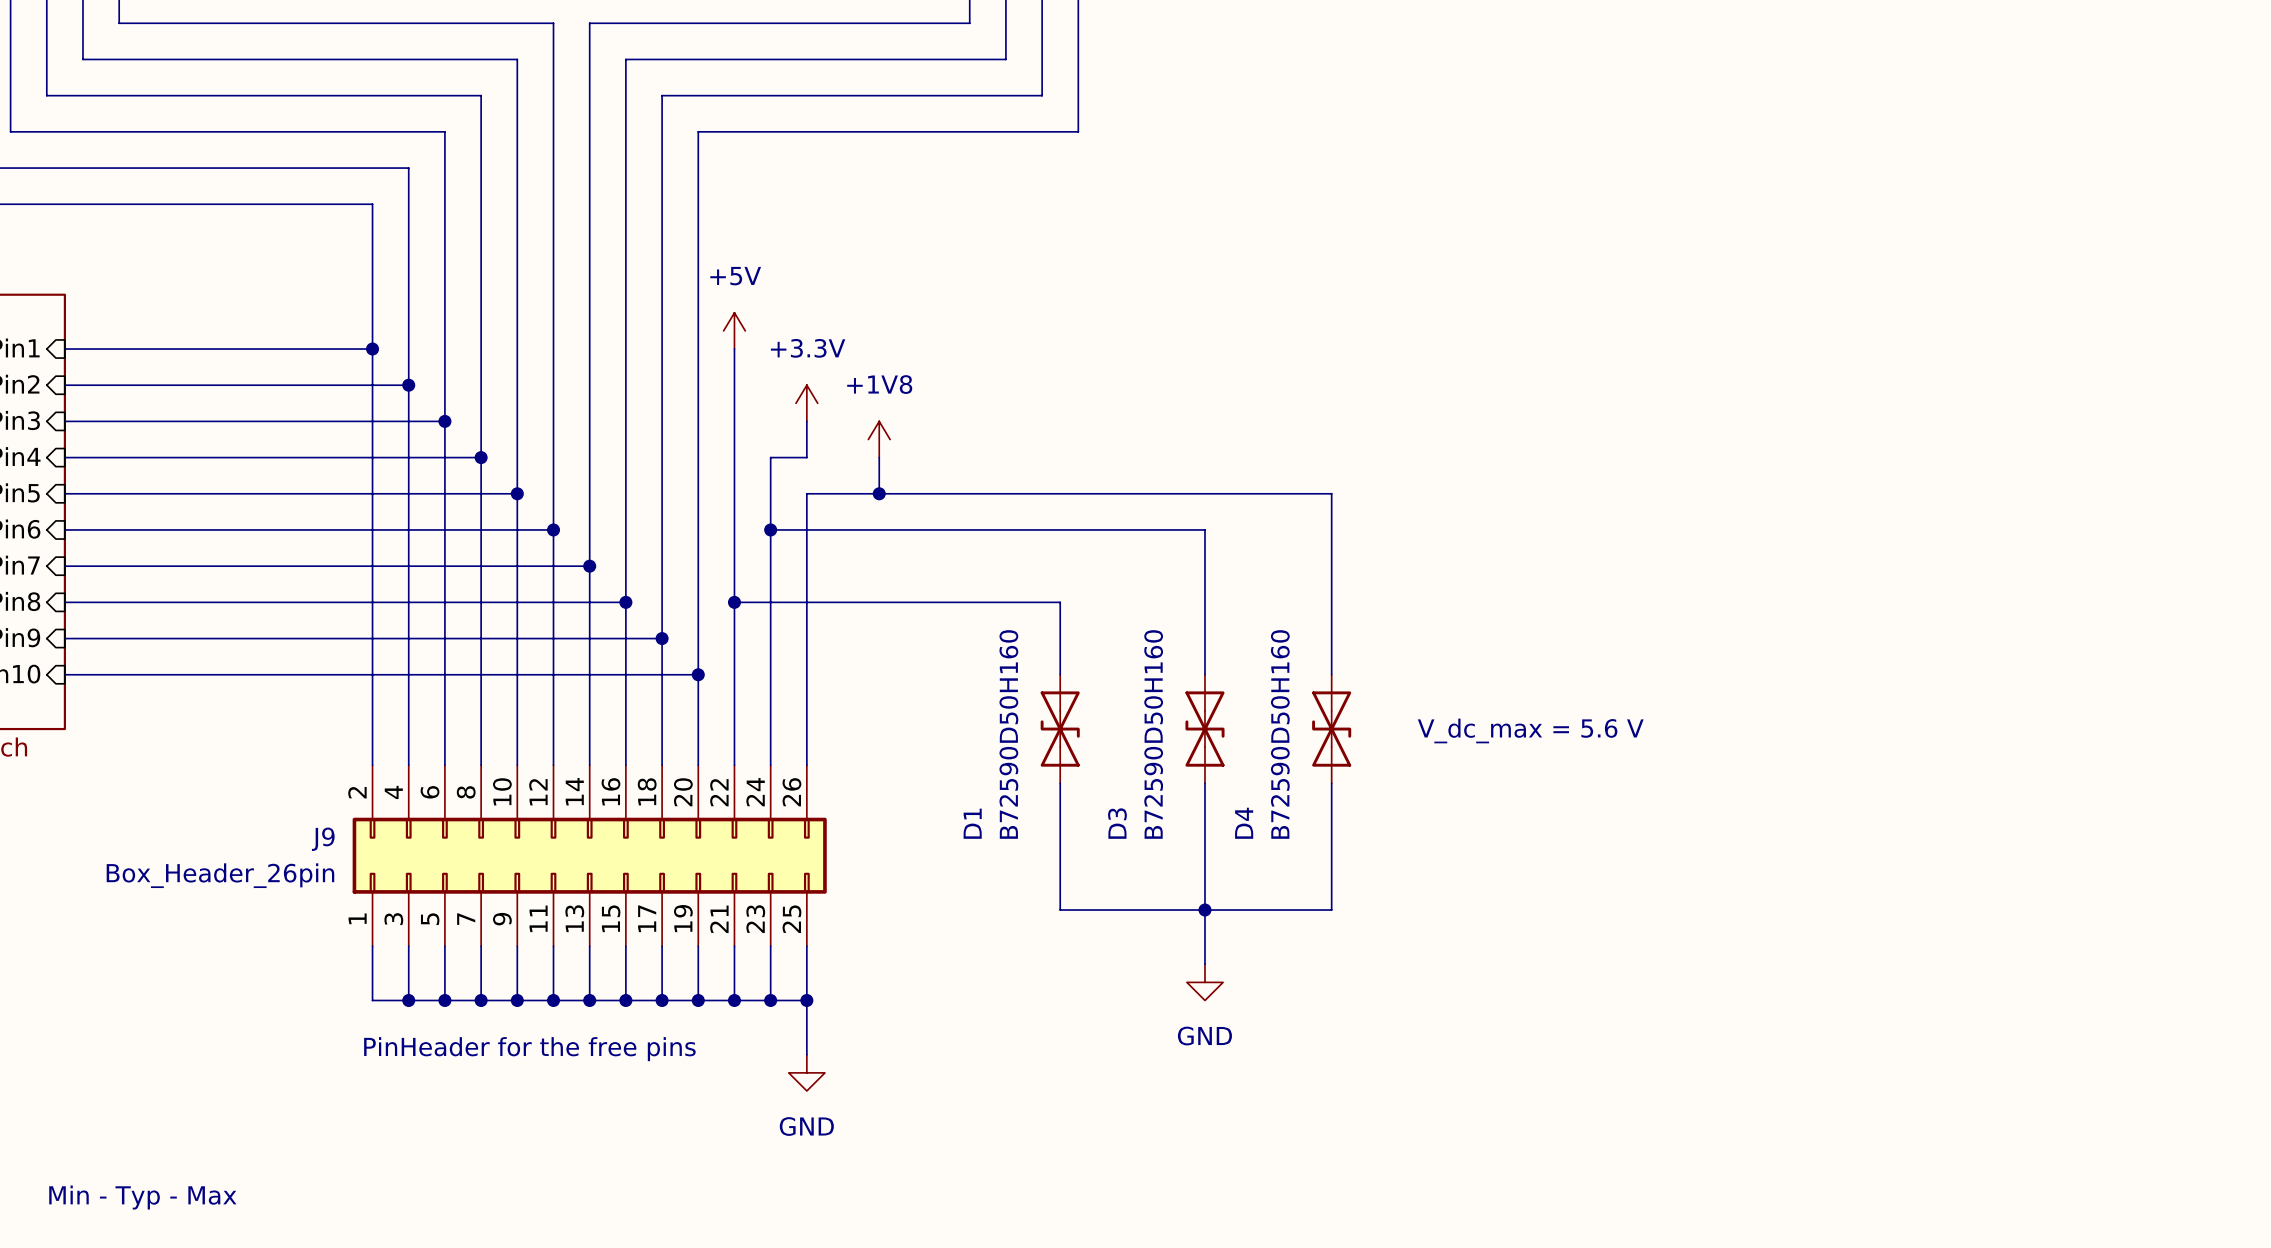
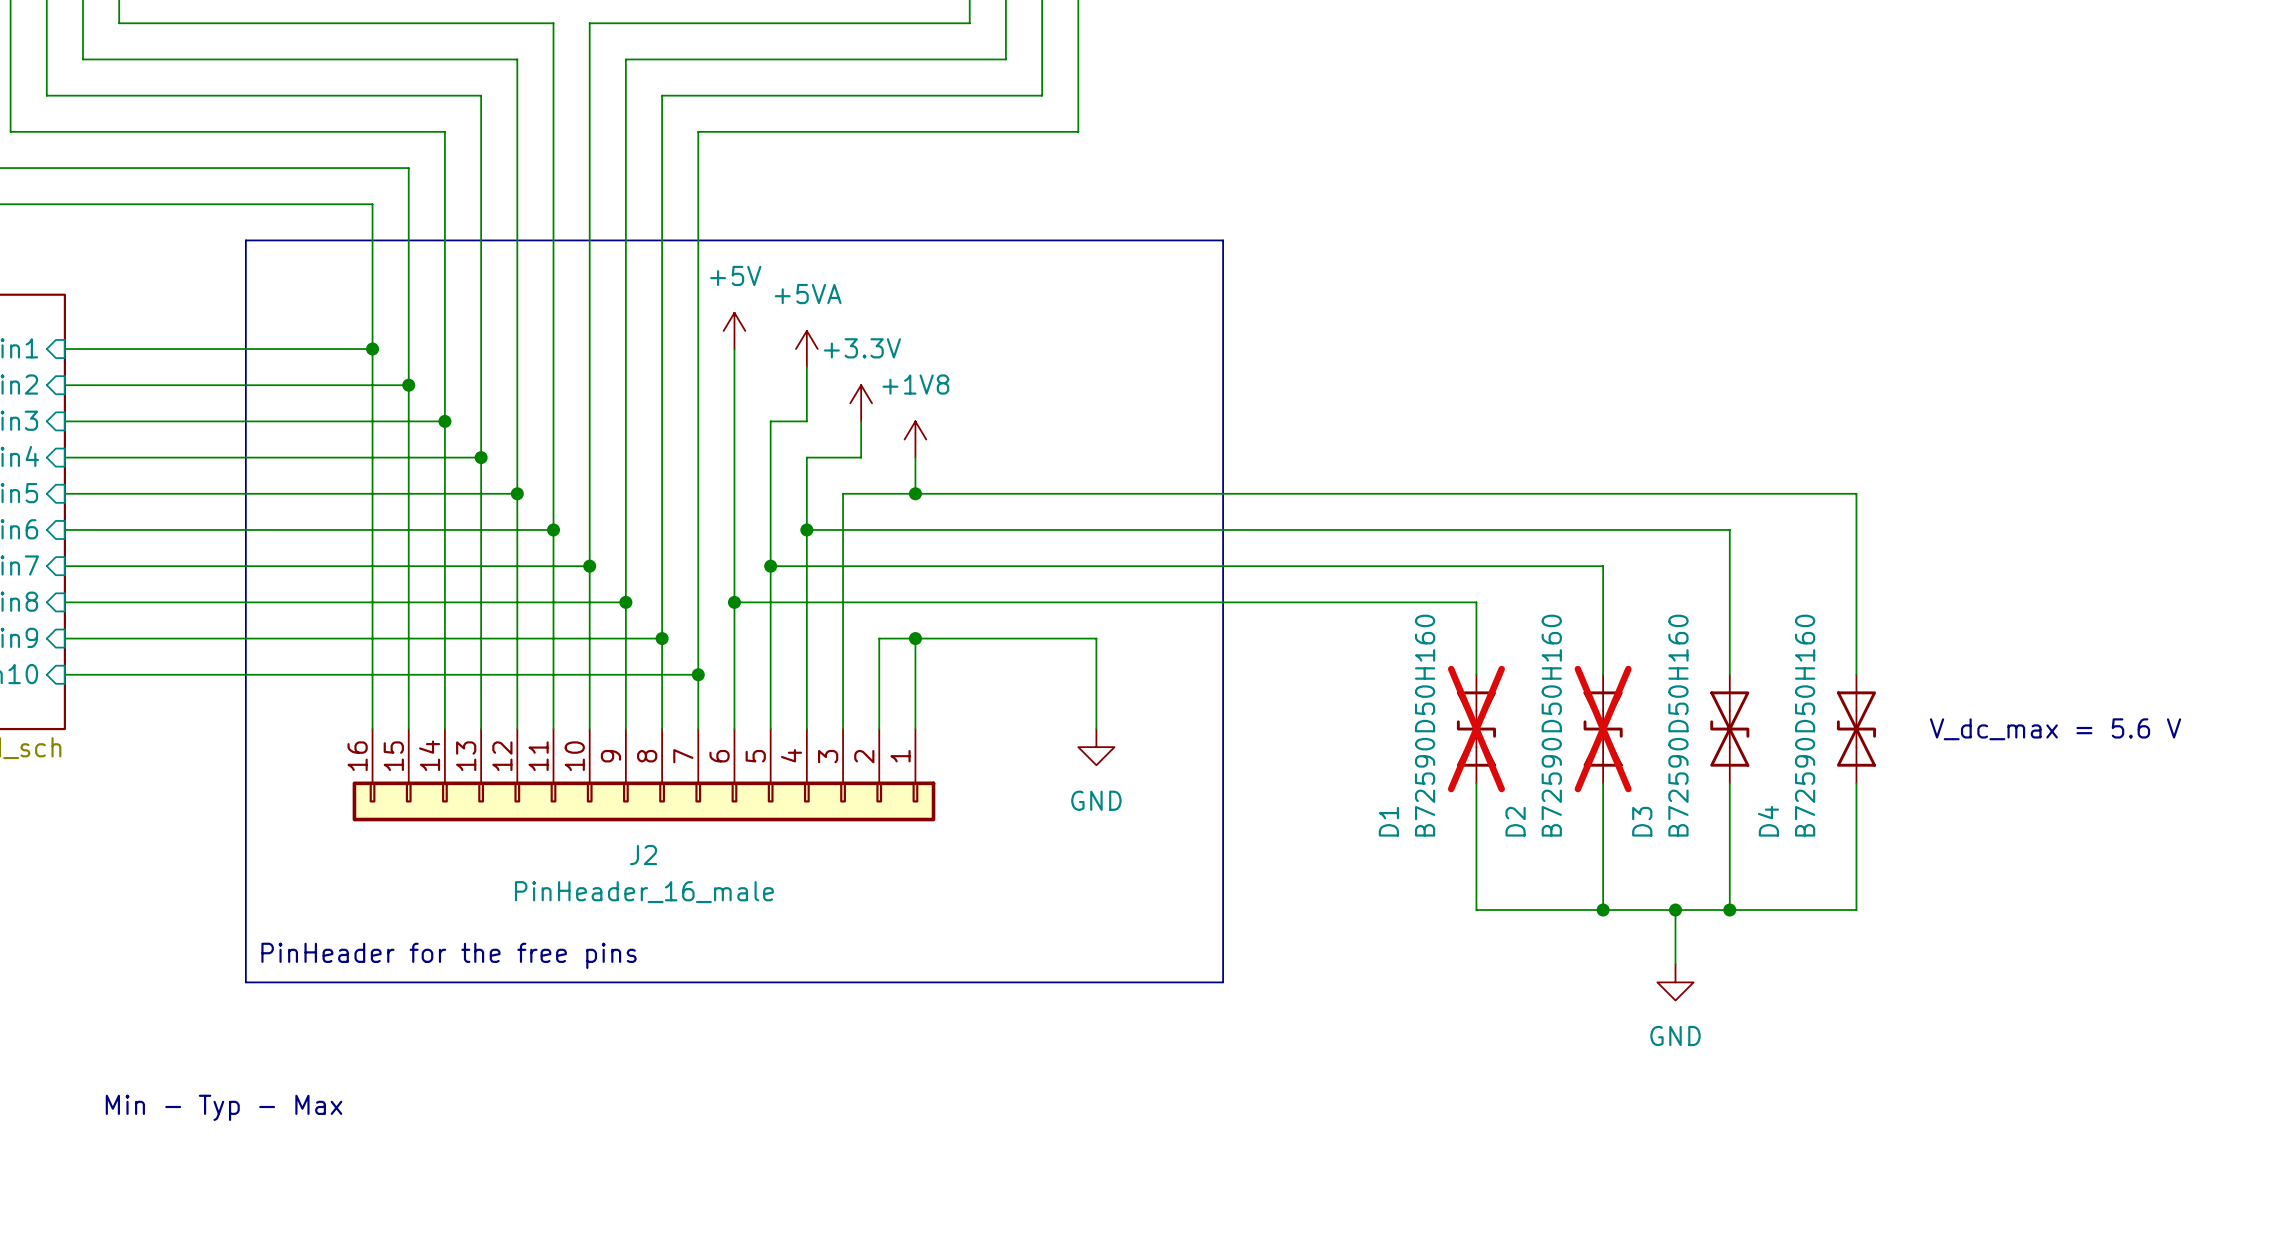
line: none -> (245, 240) (1223, 240) (1223, 982) (245, 982) (245, 240)
power symbol: none -> +5VA (806, 349)
power symbol position: +3.3V (806, 403) -> +3.3V (861, 403)
wire: (806, 421) (806, 457) (770, 457) -> (806, 367) (806, 421) (770, 421) (770, 457)
power symbol position: +1V8 (879, 439) -> +1V8 (915, 439)
wire: (879, 457) (879, 493) -> (915, 457) (915, 493)
wire: (806, 493) (843, 493) -> (806, 493) (806, 457) (861, 457) (861, 421)
wire: none -> (843, 493) (843, 729)
junction position: (879, 493) -> (915, 493)
wire: (1331, 493) (1331, 674) -> (1331, 493) (1856, 493) (1856, 674)
wire: (770, 529) (806, 529) -> none
junction: (770, 529) -> none
junction: none -> (806, 529)
wire: (1204, 529) (1204, 674) -> (1204, 529) (1729, 529) (1729, 674)
wire: none -> (770, 566) (1603, 566) (1603, 674)
junction: none -> (770, 566)
wire: (1060, 602) (1060, 674) -> (1060, 602) (1476, 602) (1476, 674)
wire: none -> (915, 638) (915, 729)
junction: none -> (915, 638)
wire: none -> (879, 729) (879, 638) (1096, 638) (1096, 729)
D1 position: (1060, 729) -> (1476, 729)
D3 position: (1204, 729) -> (1729, 729)
D4 position: (1331, 729) -> (1856, 729)
D1 do-not-place cross: none -> (1476, 729)
D2: none -> B72590D50H160 (1603, 729)
text: V_dc_max = 5.6 V (1530, 730) -> none
text: none -> V_dc_max = 5.6 V (2055, 729)
power symbol: none -> GND (1096, 747)
J2: none -> PinHeader_16_male (643, 775)
wire: (1060, 783) (1060, 910) (1331, 910) (1331, 783) -> none
wire: (1204, 783) (1204, 964) -> none
wire: none -> (1476, 783) (1476, 910) (1856, 910) (1856, 783)
wire: none -> (1603, 783) (1603, 910)
wire: none -> (1729, 783) (1729, 910)
J9: Box_Header_26pin (589, 855) -> none
junction: (1204, 910) -> none
junction: none -> (1603, 910)
wire: none -> (1675, 910) (1675, 964)
junction: none -> (1675, 910)
junction: none -> (1729, 910)
wire: (372, 946) (372, 1000) (806, 1000) -> none
wire: (408, 946) (408, 1000) -> none
wire: (444, 946) (444, 1000) -> none
wire: (481, 946) (481, 1000) -> none
wire: (517, 946) (517, 1000) -> none
wire: (553, 946) (553, 1000) -> none
wire: (589, 946) (589, 1000) -> none
wire: (625, 946) (625, 1000) -> none
wire: (662, 946) (662, 1000) -> none
wire: (698, 946) (698, 1000) -> none
wire: (734, 946) (734, 1000) -> none
wire: (770, 946) (770, 1000) -> none
wire: (806, 946) (806, 1054) -> none
power symbol: GND (1204, 982) -> none
power symbol: none -> GND (1675, 982)
junction: (408, 1000) -> none
junction: (444, 1000) -> none
junction: (481, 1000) -> none
junction: (517, 1000) -> none
junction: (553, 1000) -> none
junction: (589, 1000) -> none
junction: (625, 1000) -> none
junction: (662, 1000) -> none
junction: (698, 1000) -> none
junction: (734, 1000) -> none
junction: (770, 1000) -> none
junction: (806, 1000) -> none
text position: PinHeader for the free pins (529, 1049) -> PinHeader for the free pins (449, 955)
power symbol: GND (806, 1072) -> none
text position: Min - Typ - Max (142, 1197) -> Min - Typ - Max (224, 1107)

